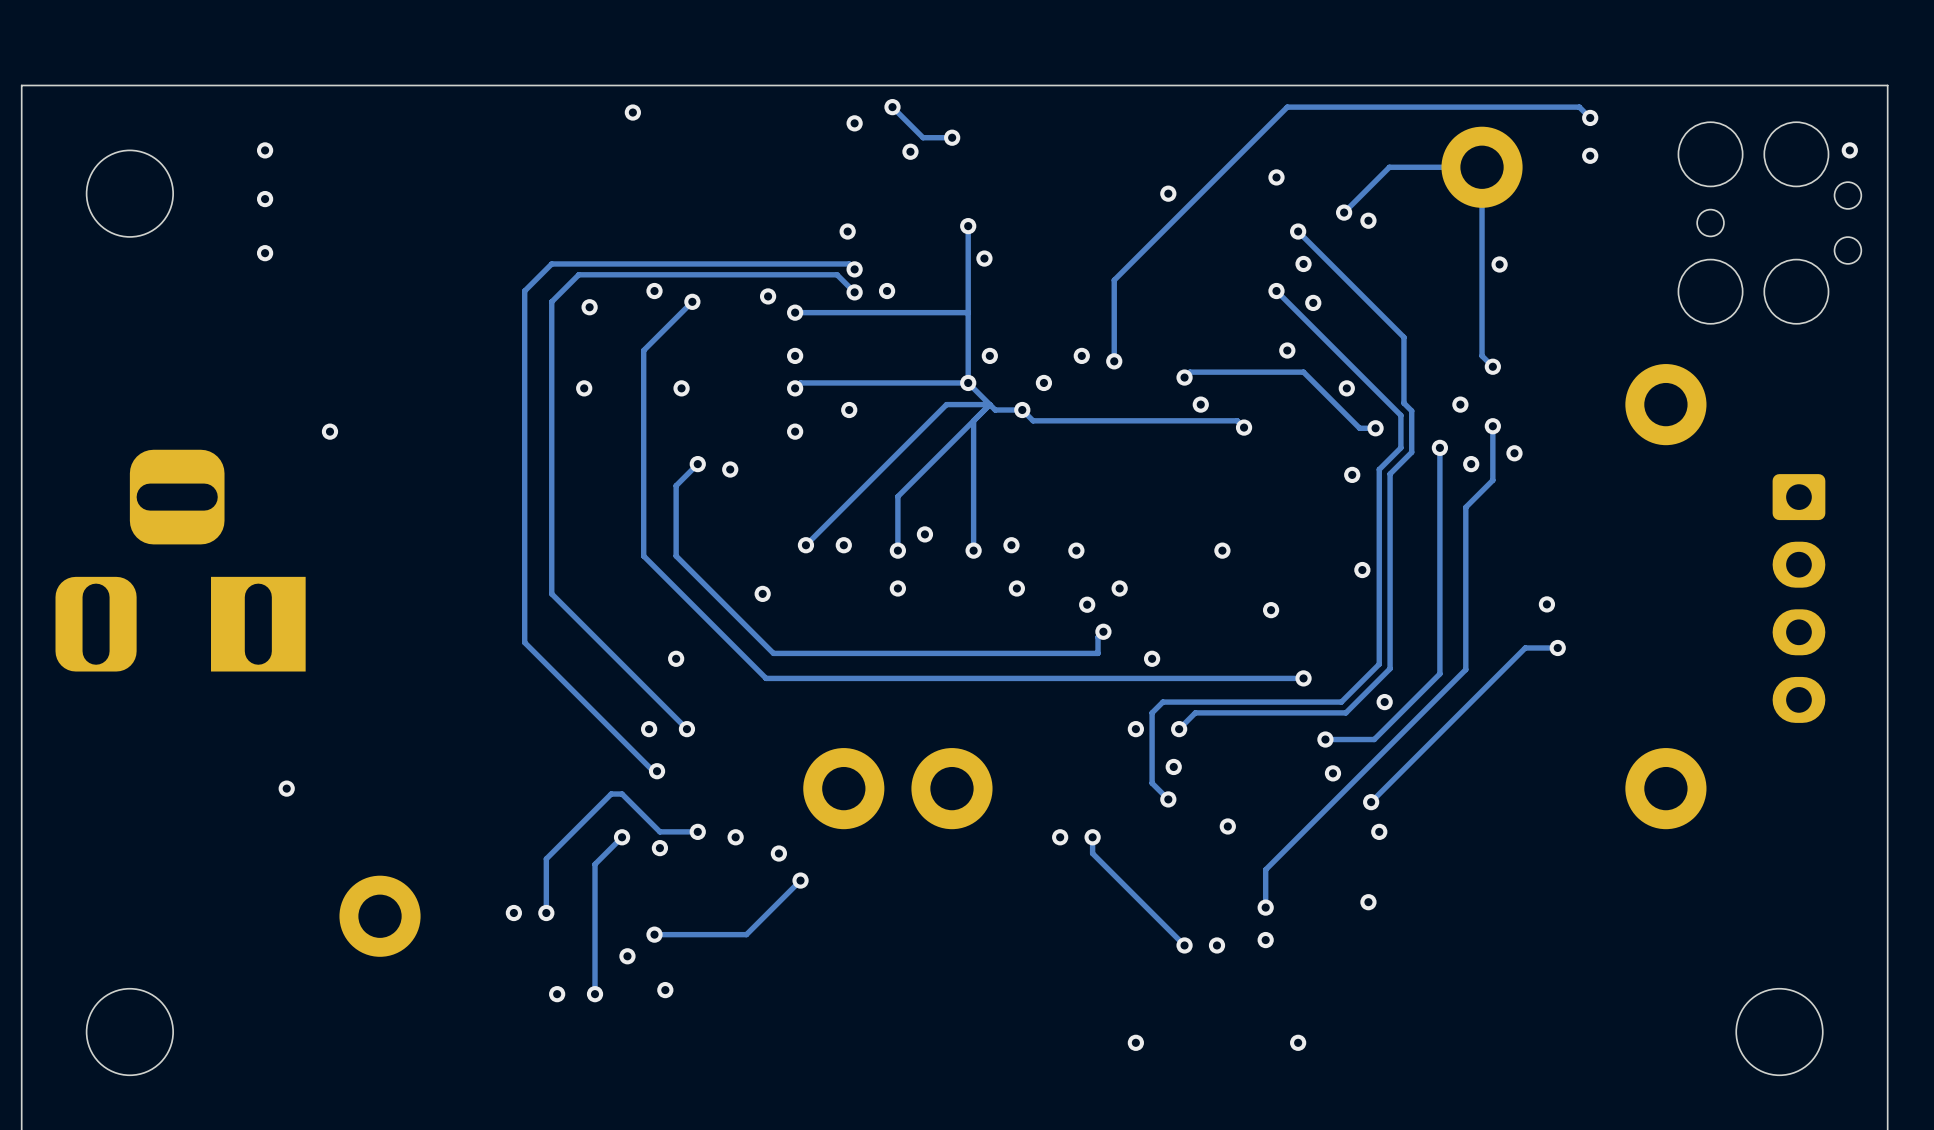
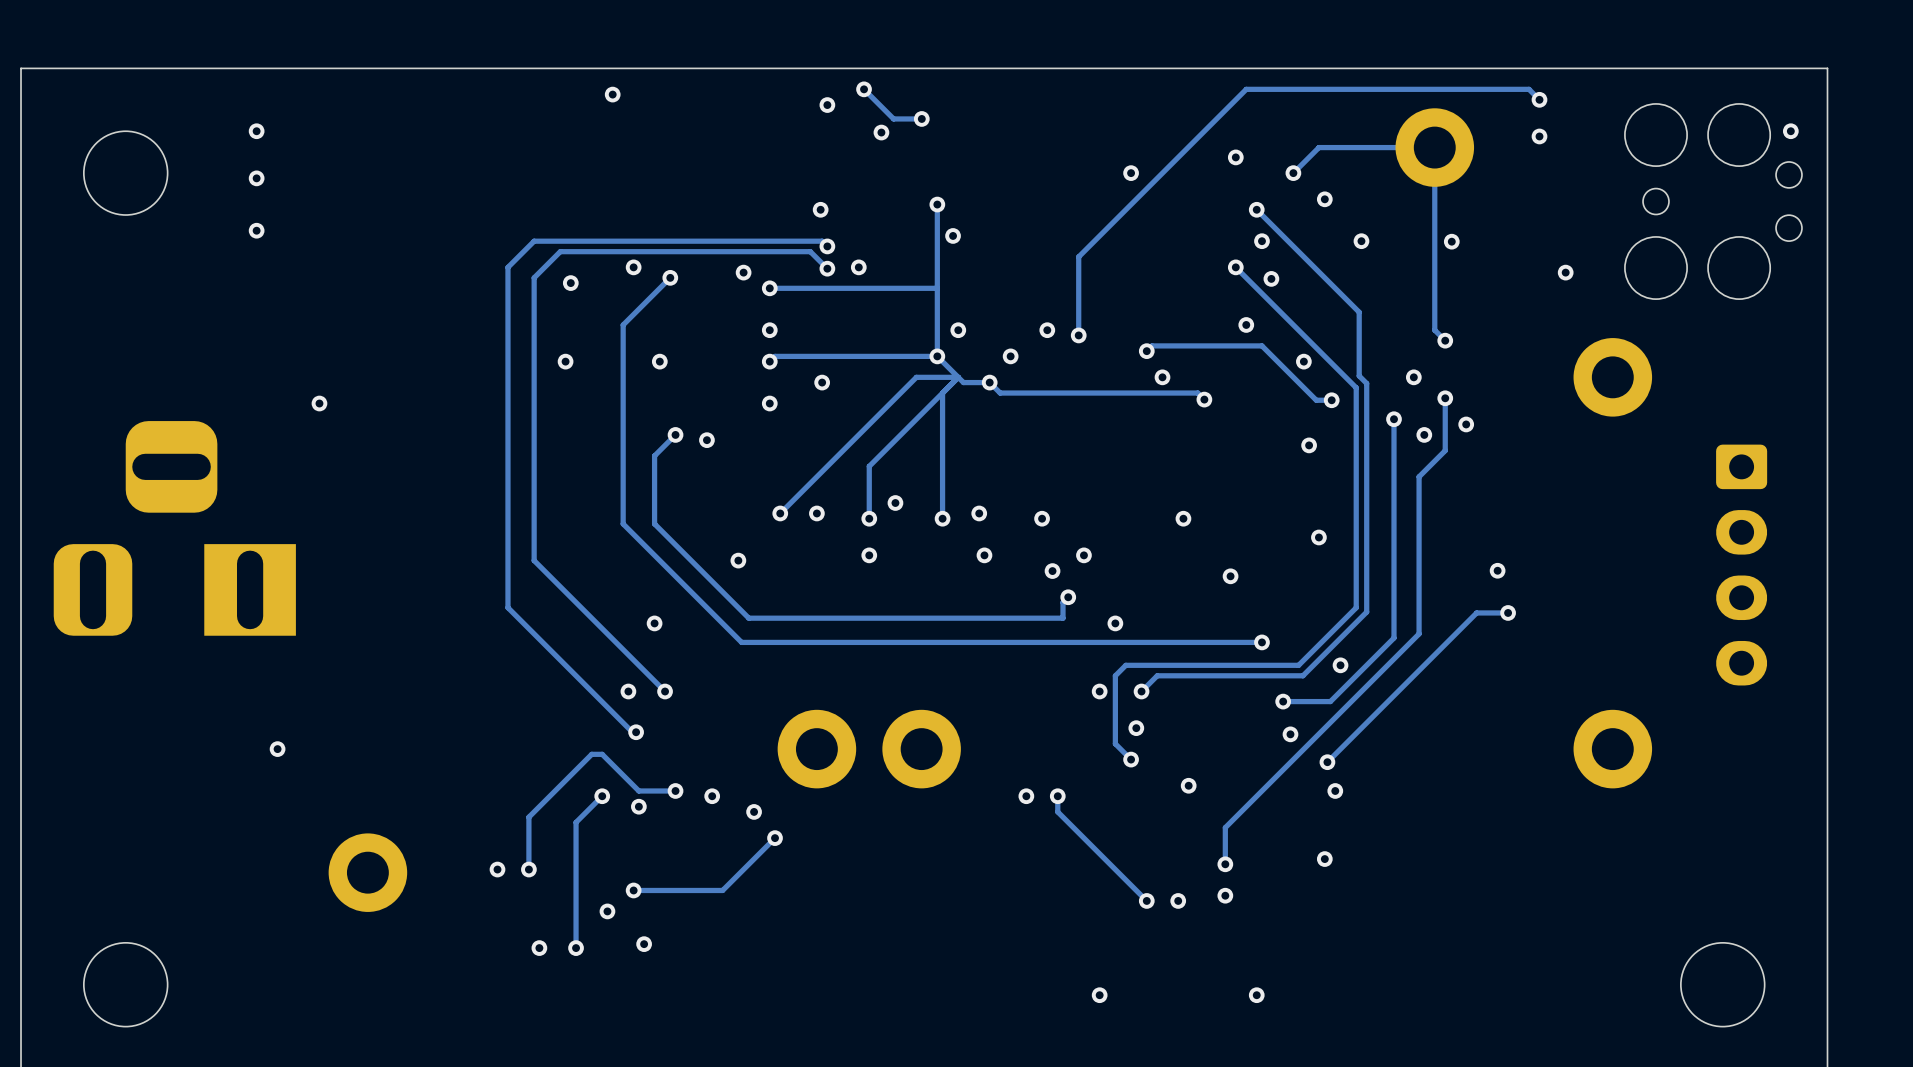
track: (1389, 167) (1344, 212) -> (1345, 147) (1318, 147) (1293, 173)
via position: (1344, 212) -> (1293, 173)
via: none -> (1361, 241)
via: none -> (1565, 272)
track: (1400, 447) (1379, 469) (1379, 664) -> (1356, 419) (1356, 607) (1335, 628)
track: (1411, 452) (1390, 473) (1390, 668) -> (1366, 423) (1366, 612) (1345, 633)

